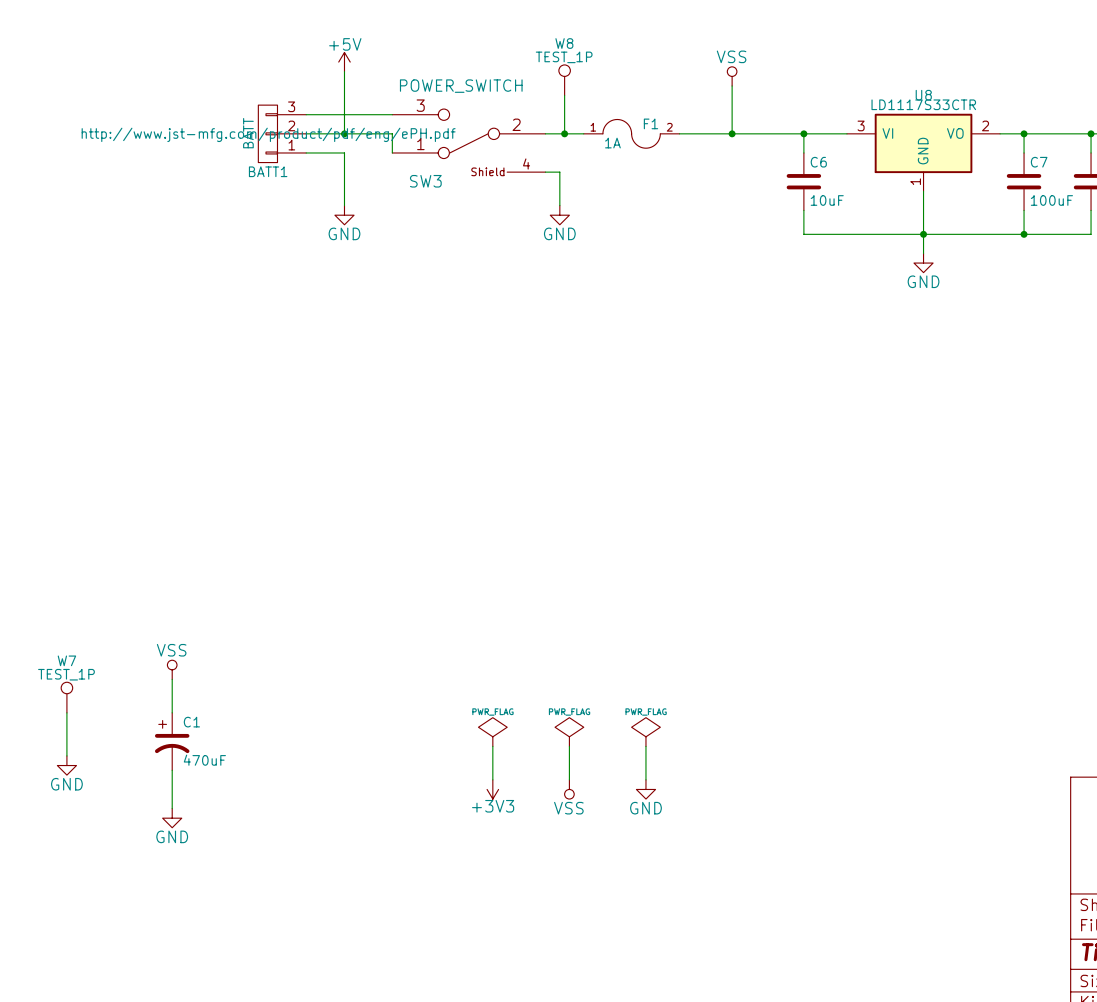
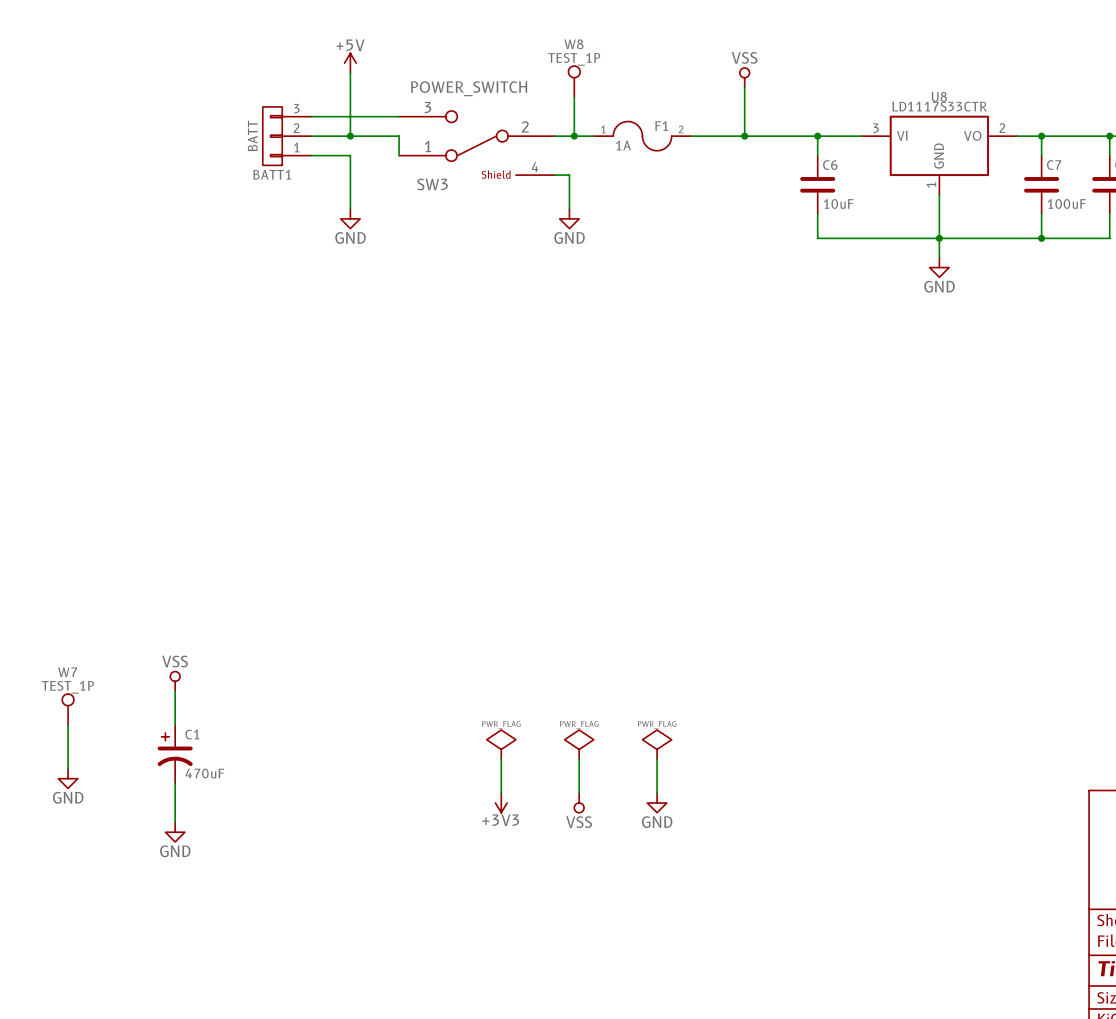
BATT1 text: http://www.jst-mfg.com/product/pdf/eng/ePH.pdf (268, 134) -> none

